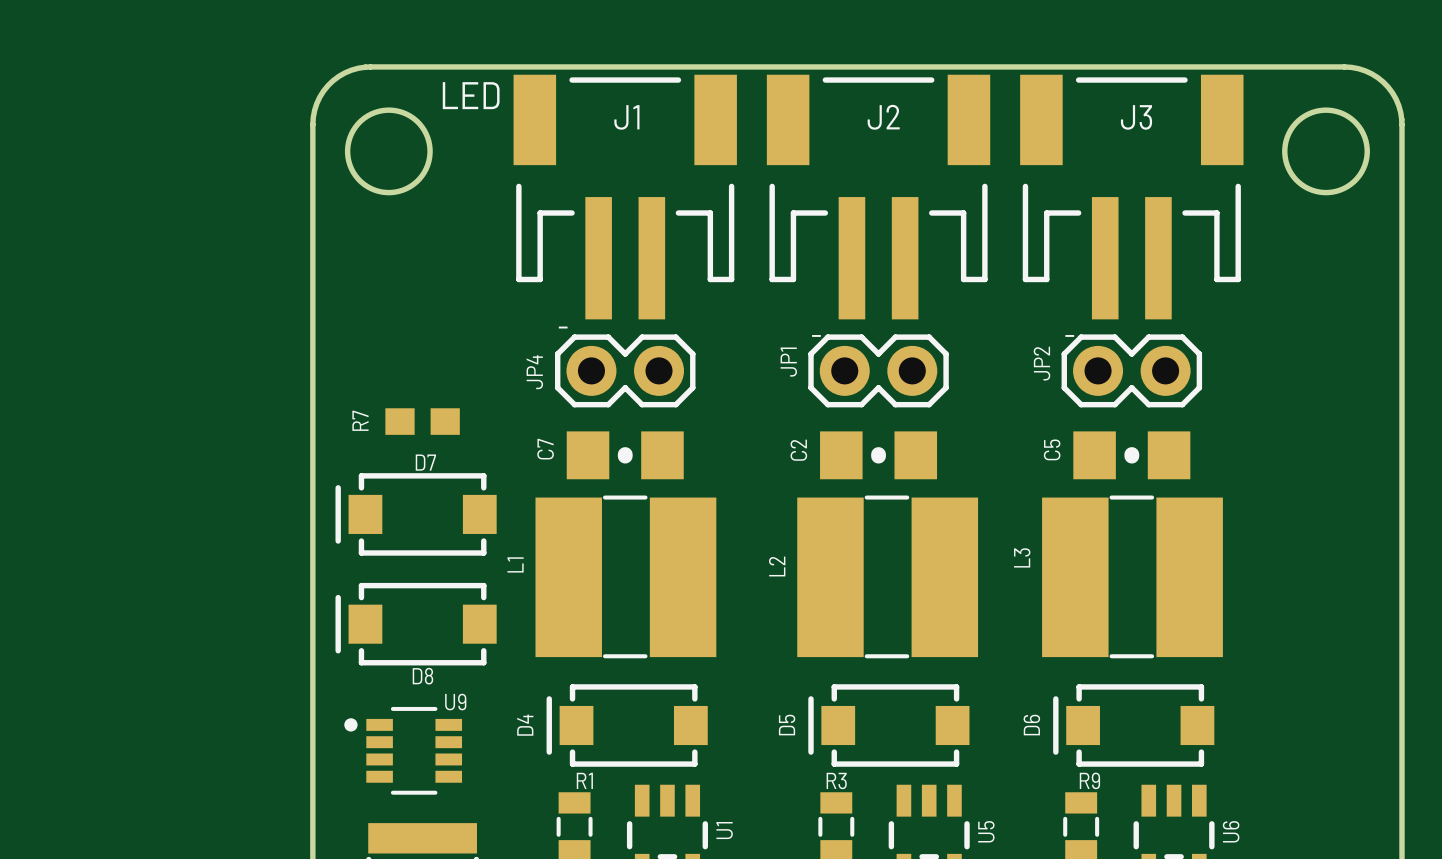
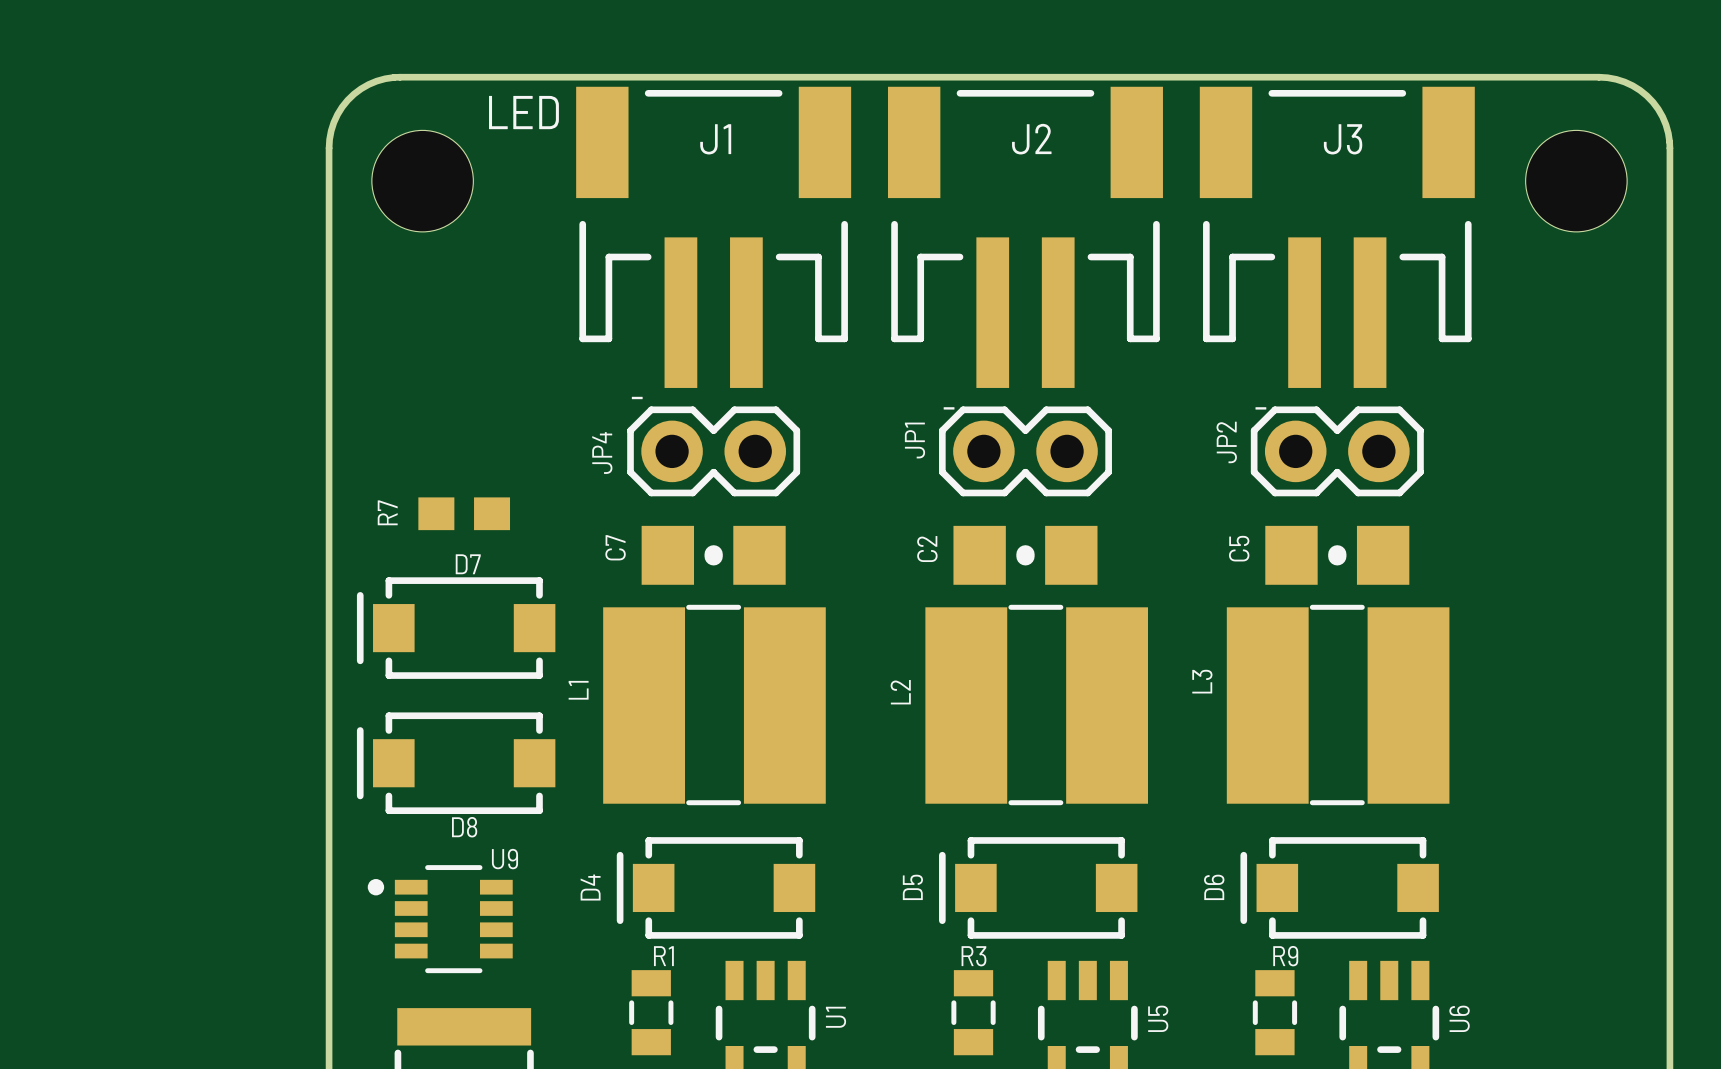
round board edge: [344, 107, 433, 196] -> none
round board edge: [1282, 107, 1370, 196] -> none
hole: none -> (422, 181)
hole: none -> (1576, 181)

